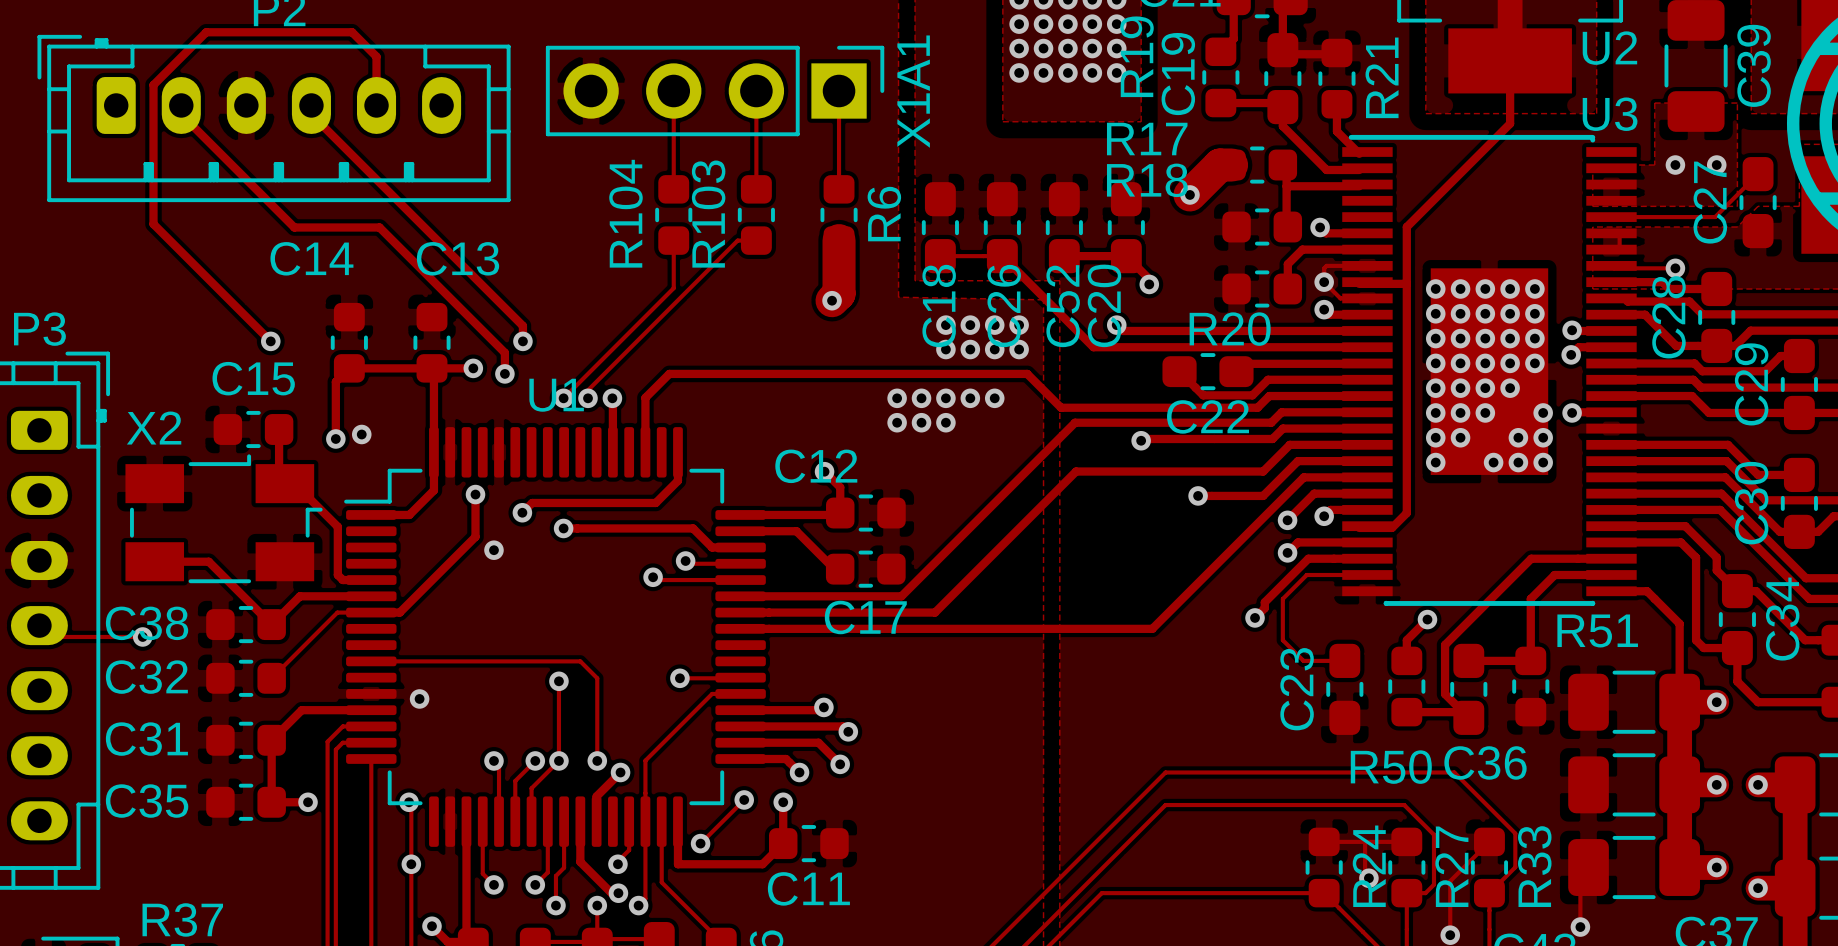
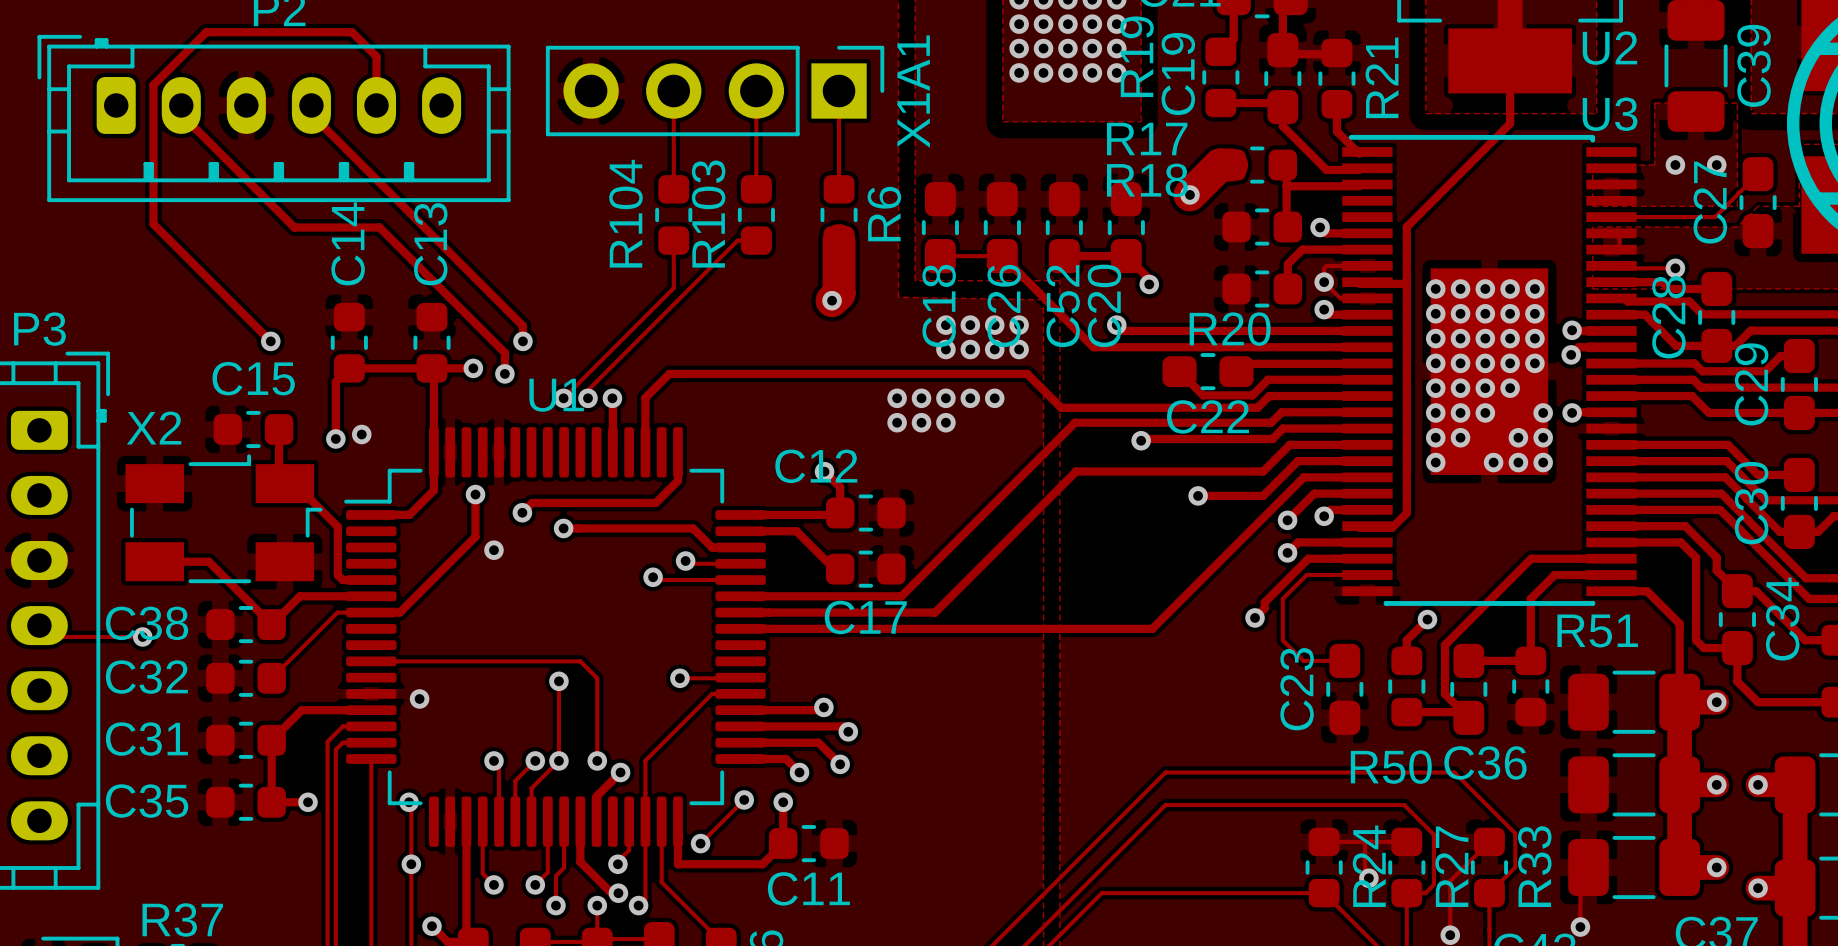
C14 name rotation: 0° (311, 258) -> 90° counterclockwise (348, 243)
C13 name rotation: 0° (458, 258) -> 90° counterclockwise (430, 244)

